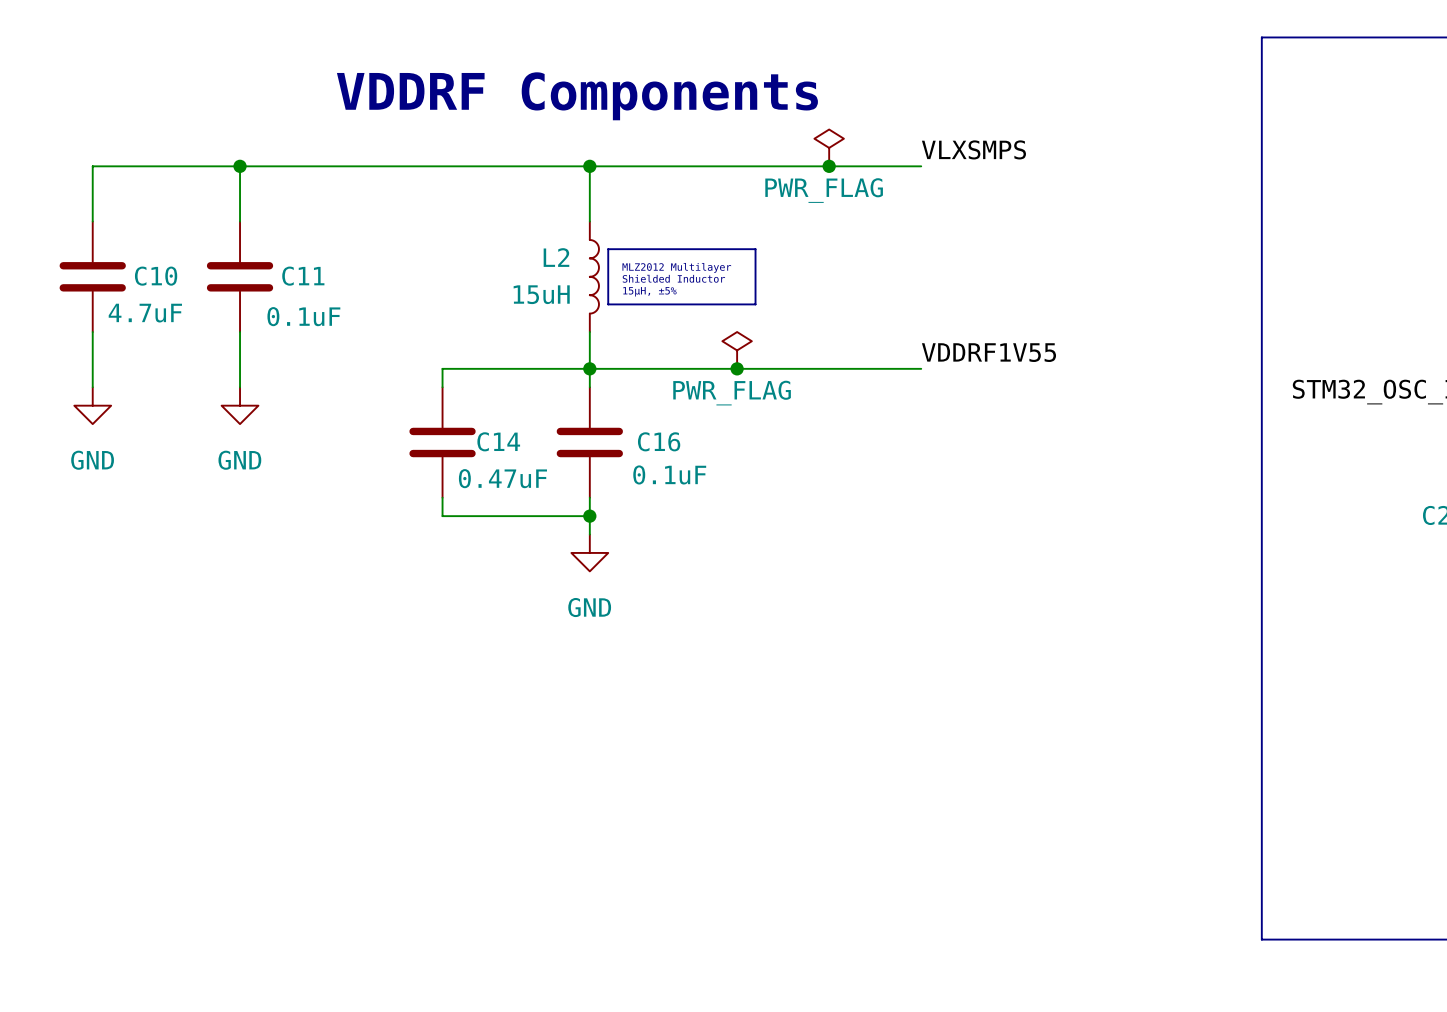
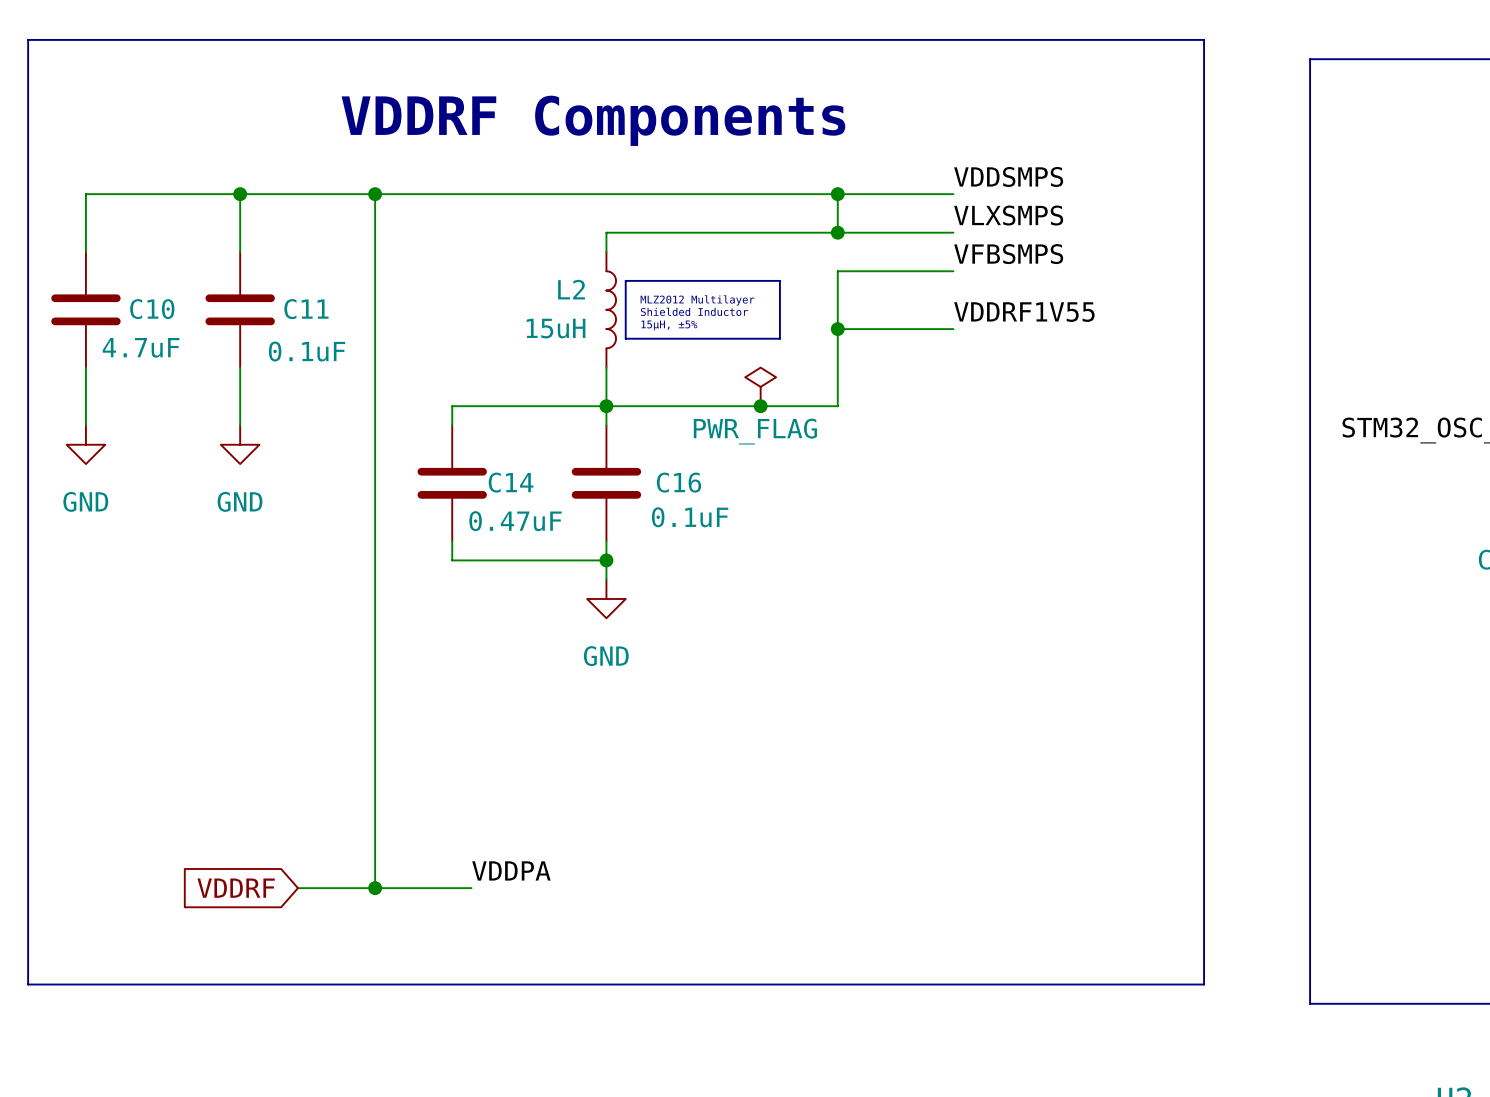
line: none -> (28, 39) (1204, 39) (1204, 984) (28, 984) (28, 39)
power symbol: PWR_FLAG (829, 147) -> none
label: VLXSMPS (973, 149) -> VDDSMPS (1008, 176)
wire: none -> (375, 194) (375, 888)
junction: none -> (375, 194)
wire: (589, 166) (589, 203) -> (953, 232) (606, 232)
junction: (589, 166) -> none
wire: none -> (837, 194) (837, 232)
junction position: (829, 166) -> (837, 194)
label: none -> VLXSMPS (1008, 215)
junction: none -> (837, 232)
label: none -> VFBSMPS (1008, 254)
wire: none -> (837, 329) (953, 329)
junction: none -> (837, 329)
label position: VDDRF1V55 (988, 352) -> VDDRF1V55 (1024, 312)
wire: (810, 368) (921, 368) -> (837, 406) (837, 271) (953, 271)
label: none -> VDDPA (511, 870)
global label: none -> VDDRF (236, 888)
wire: none -> (298, 888) (471, 888)
junction: none -> (375, 888)

